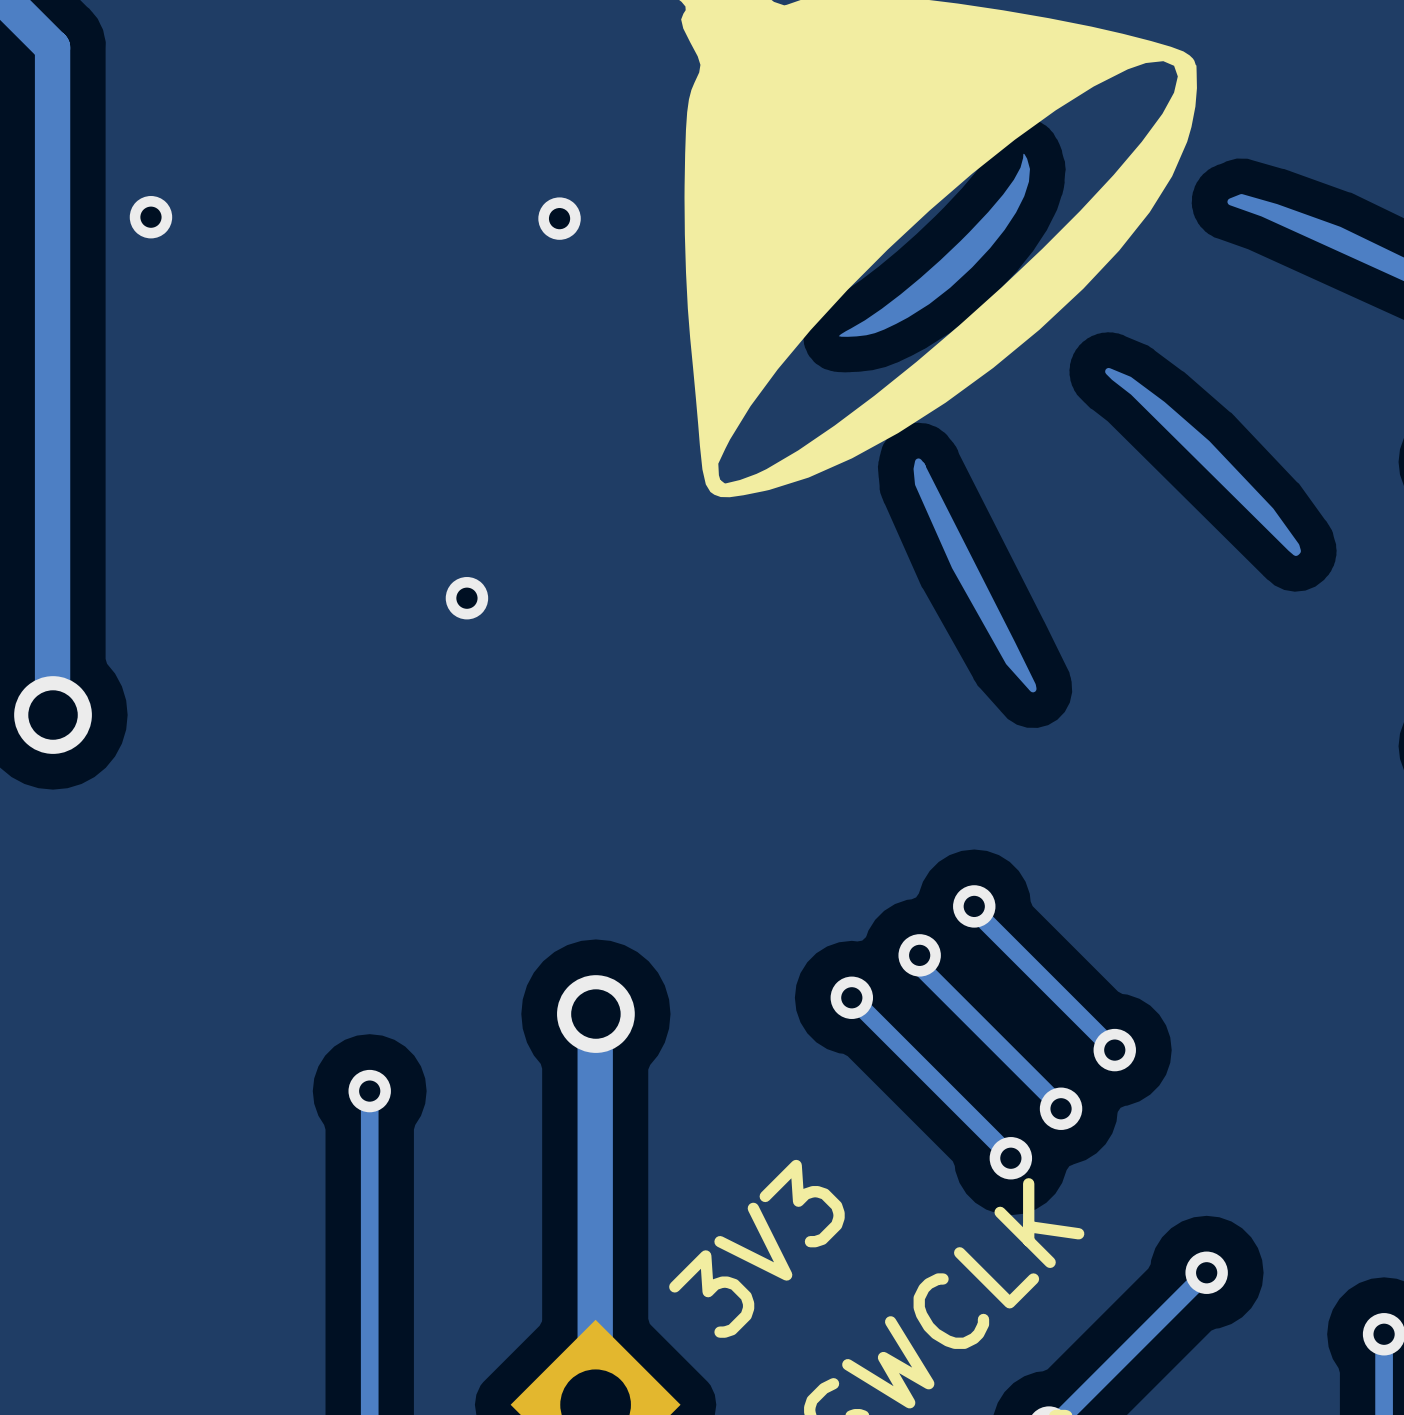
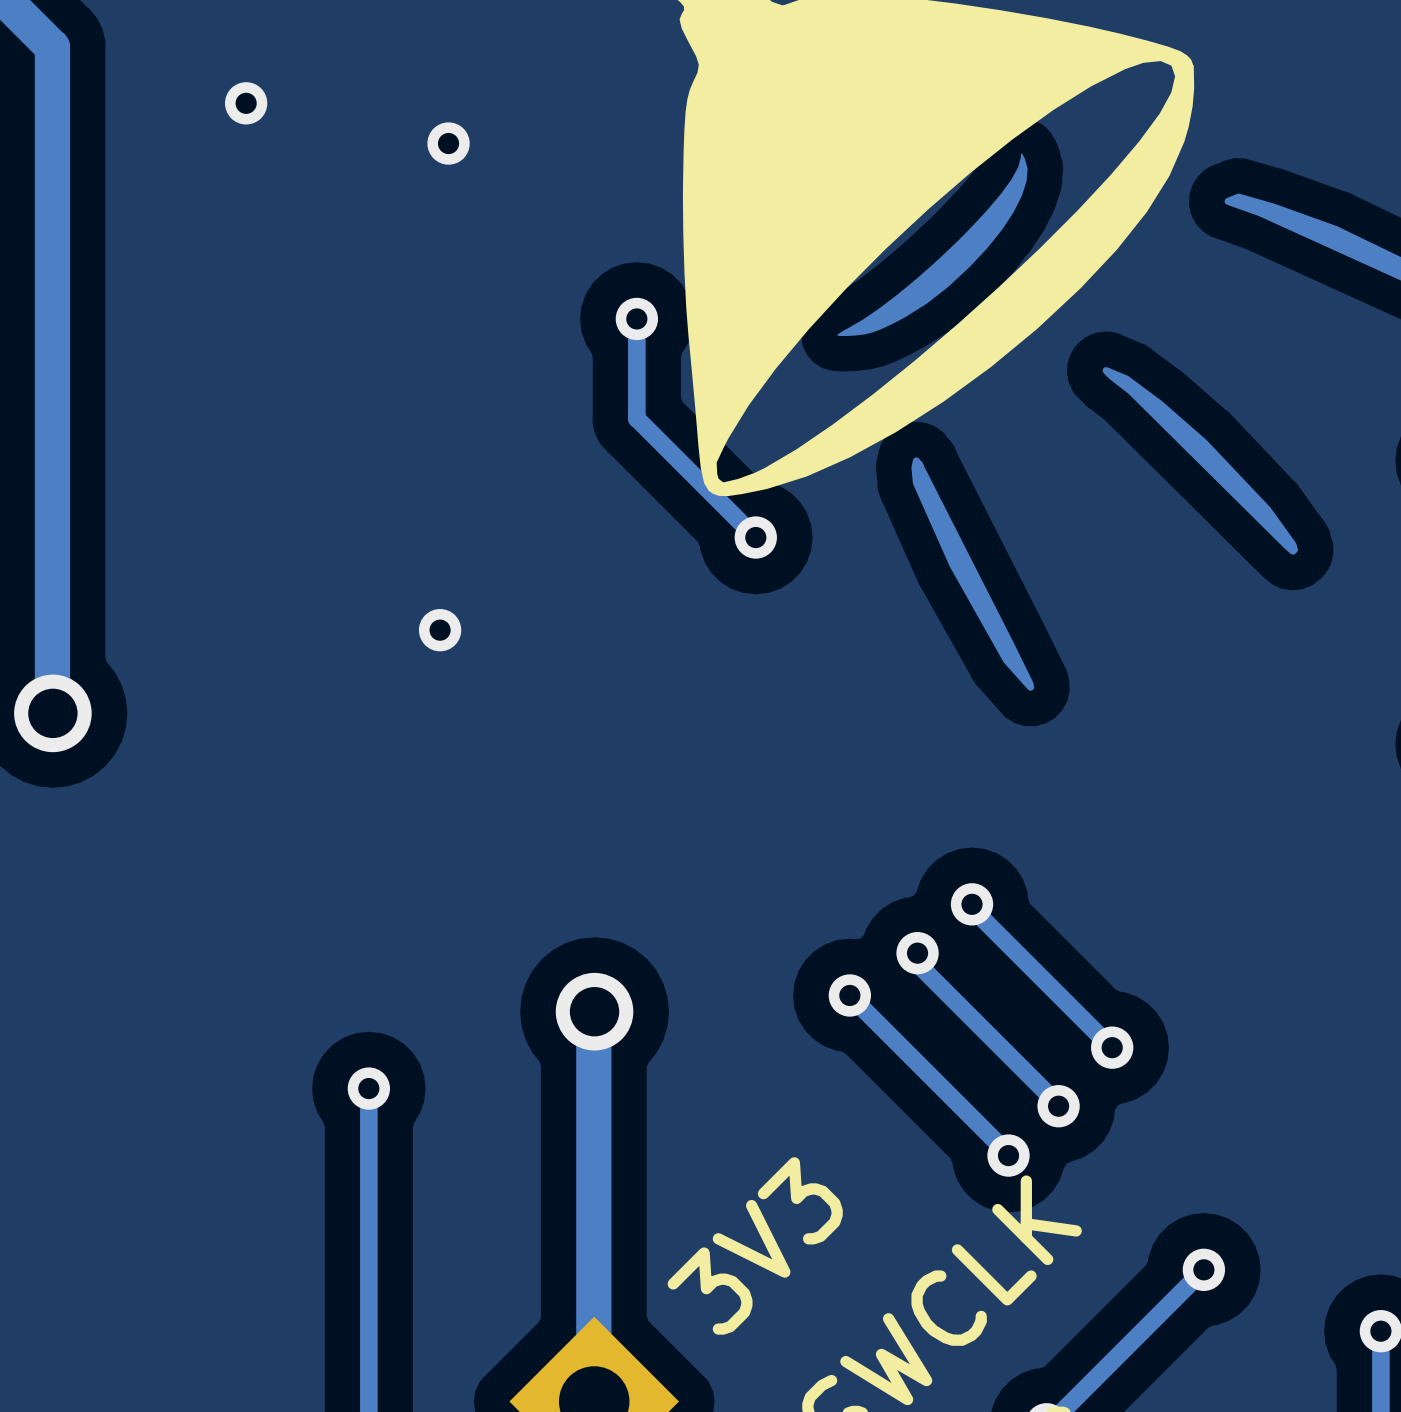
via: none -> (448, 143)
via position: (150, 217) -> (246, 103)
via: (559, 218) -> none
track: none -> (636, 318) (636, 418) (755, 537)
via: none -> (636, 318)
via: none -> (755, 537)
via position: (466, 598) -> (440, 630)

